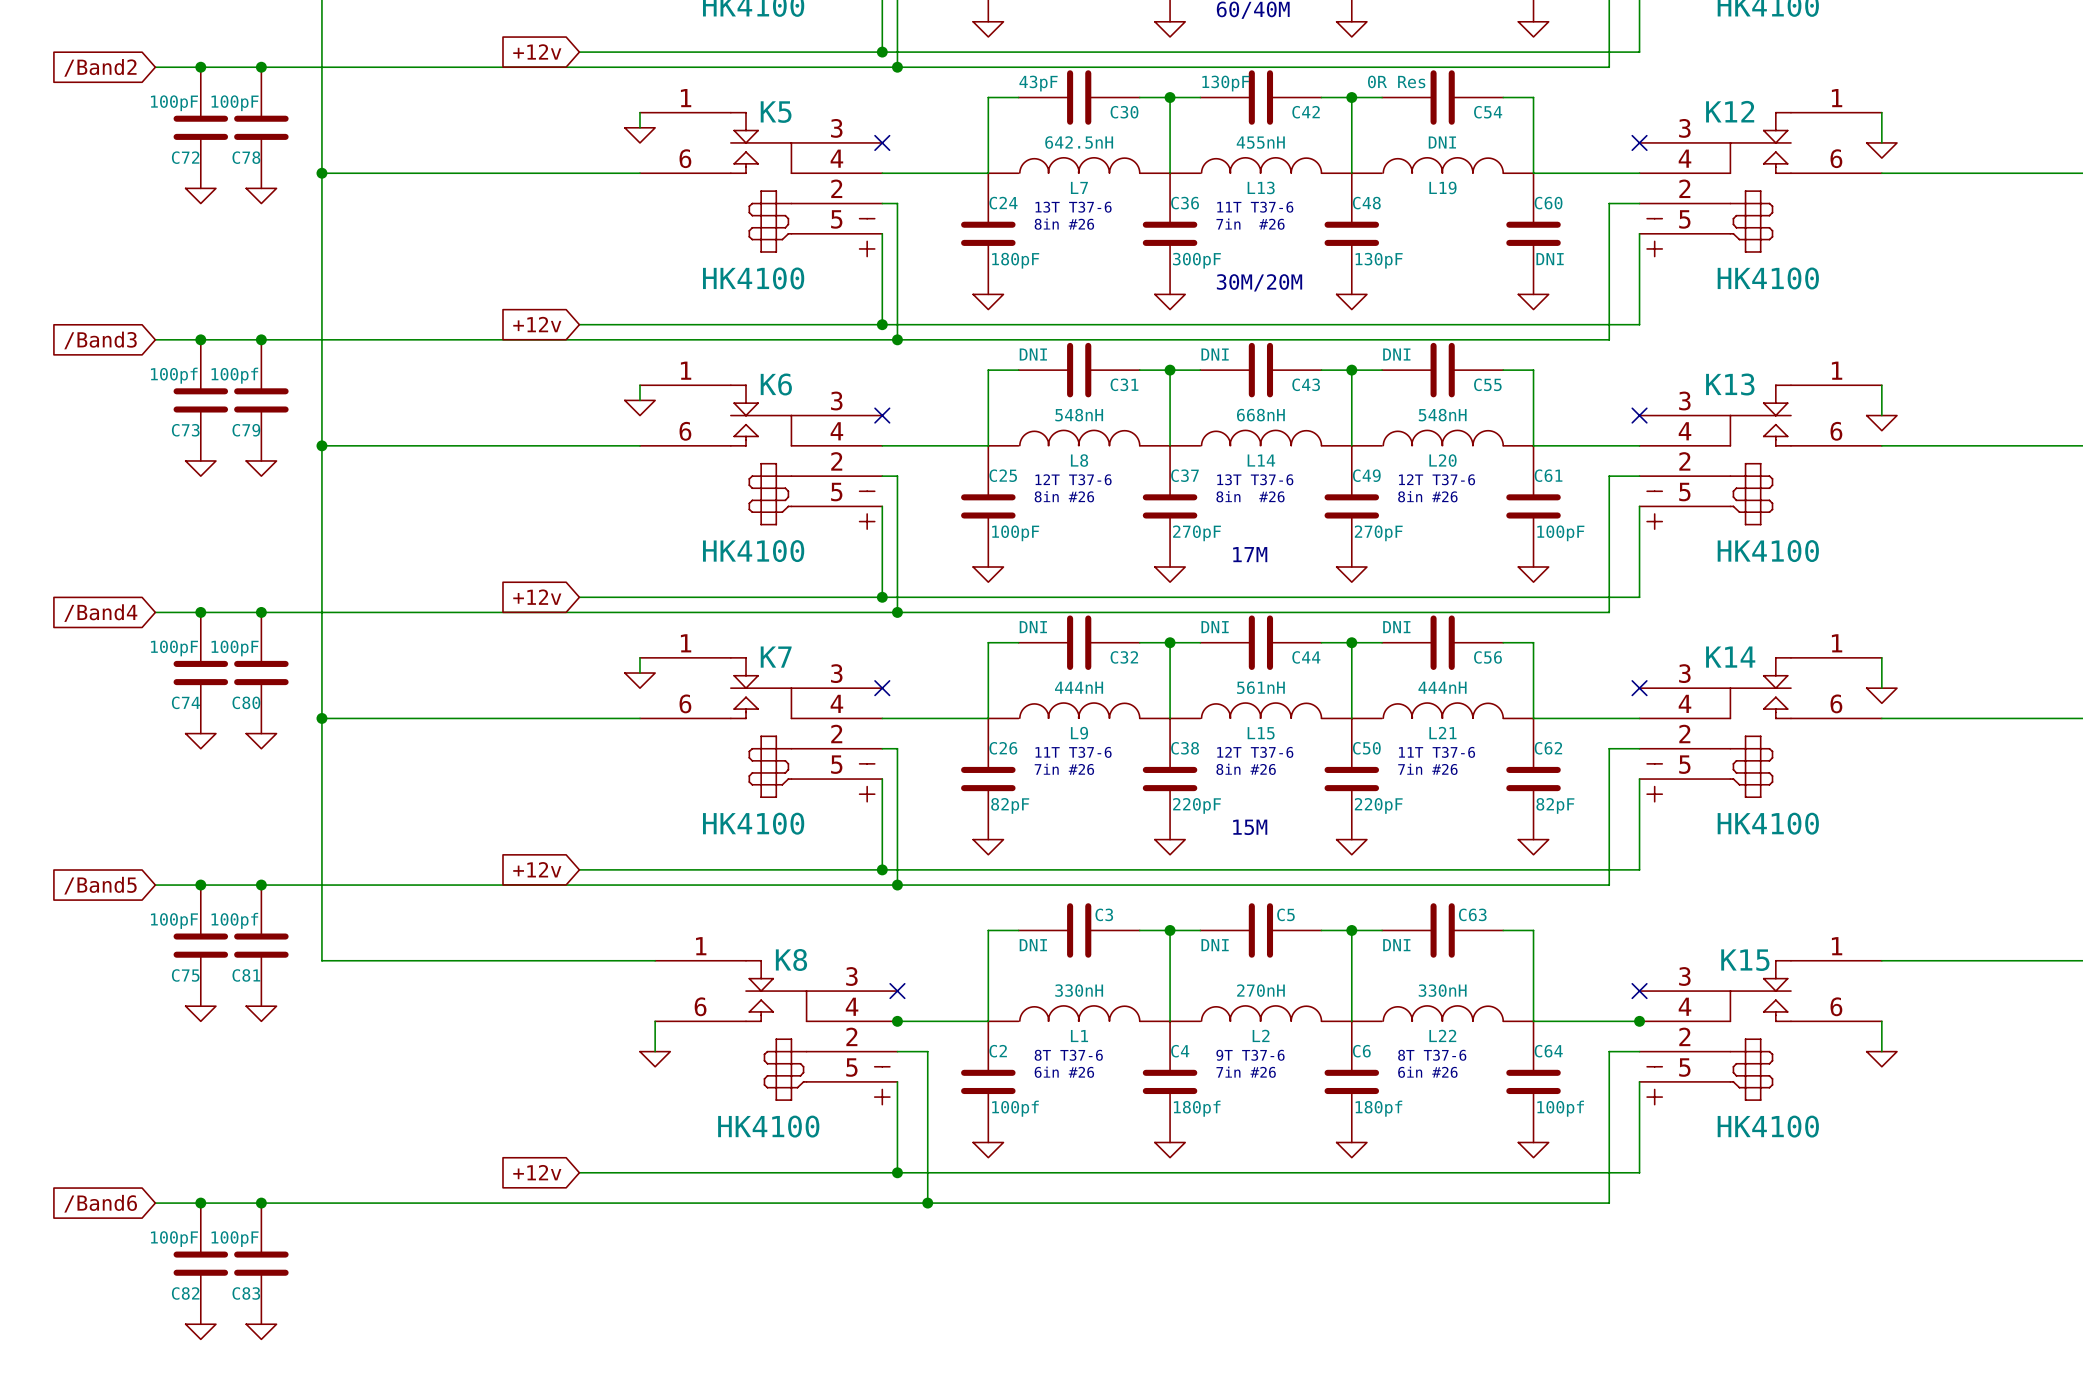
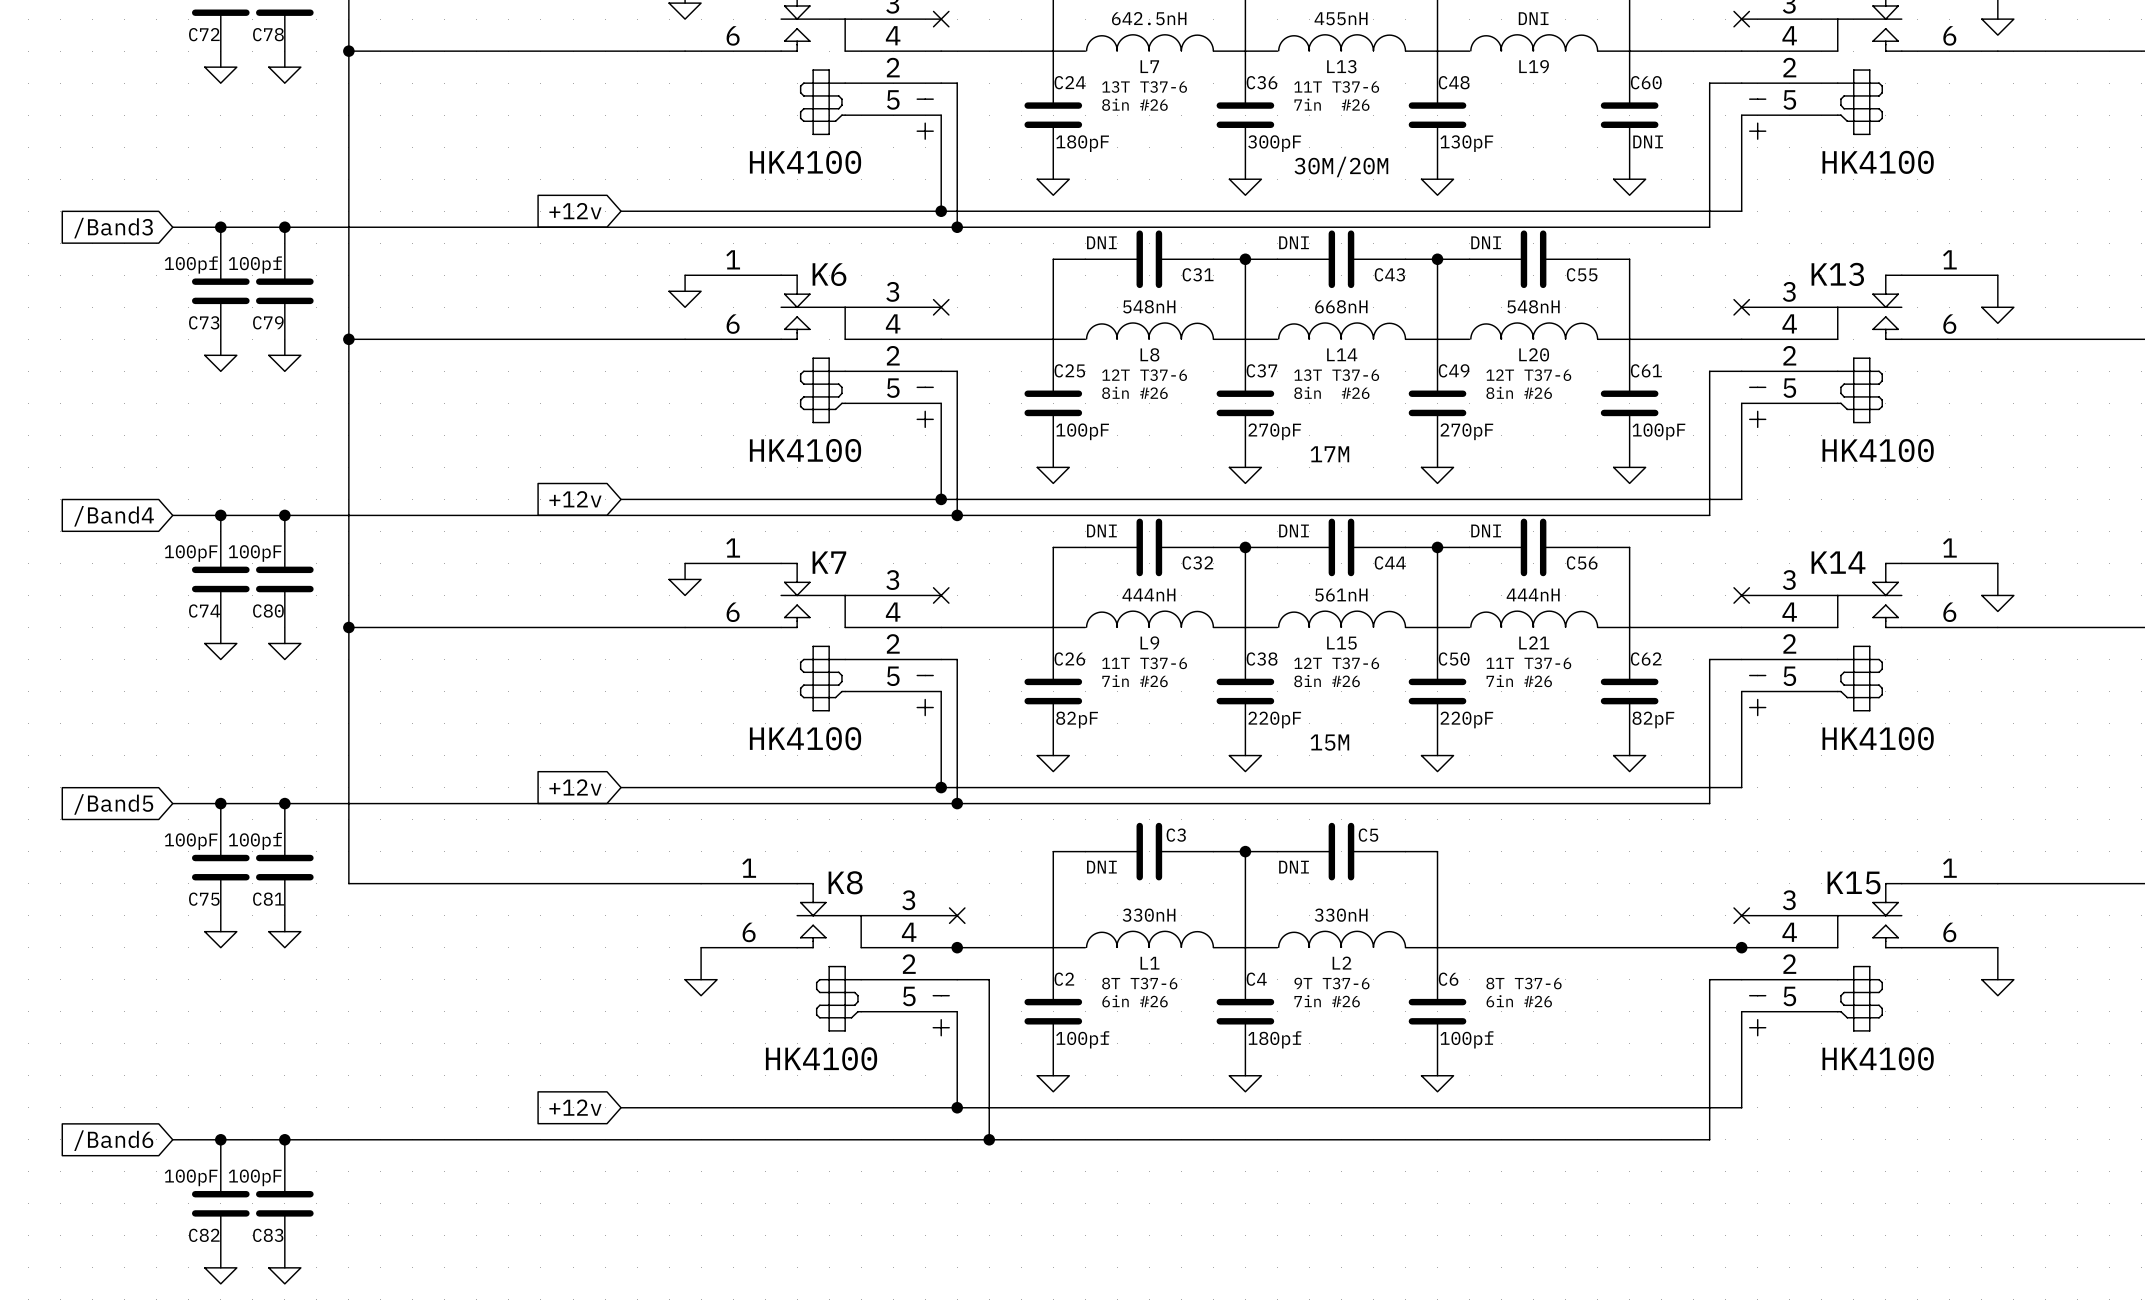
wire: (1351, 930) (1382, 930) -> none
junction: (1351, 930) -> none
C63: DNI (1442, 930) -> none
wire: (1503, 930) (1533, 930) (1533, 1021) -> (1437, 947) (1629, 947)
L2 value: 270nH (1260, 990) -> 330nH (1341, 915)
L22: 330nH (1442, 1013) -> none
C64: 100pf (1533, 1081) -> none
C6 value: 180pf (1378, 1108) -> 100pf (1466, 1039)
power symbol: (1533, 1150) -> none

